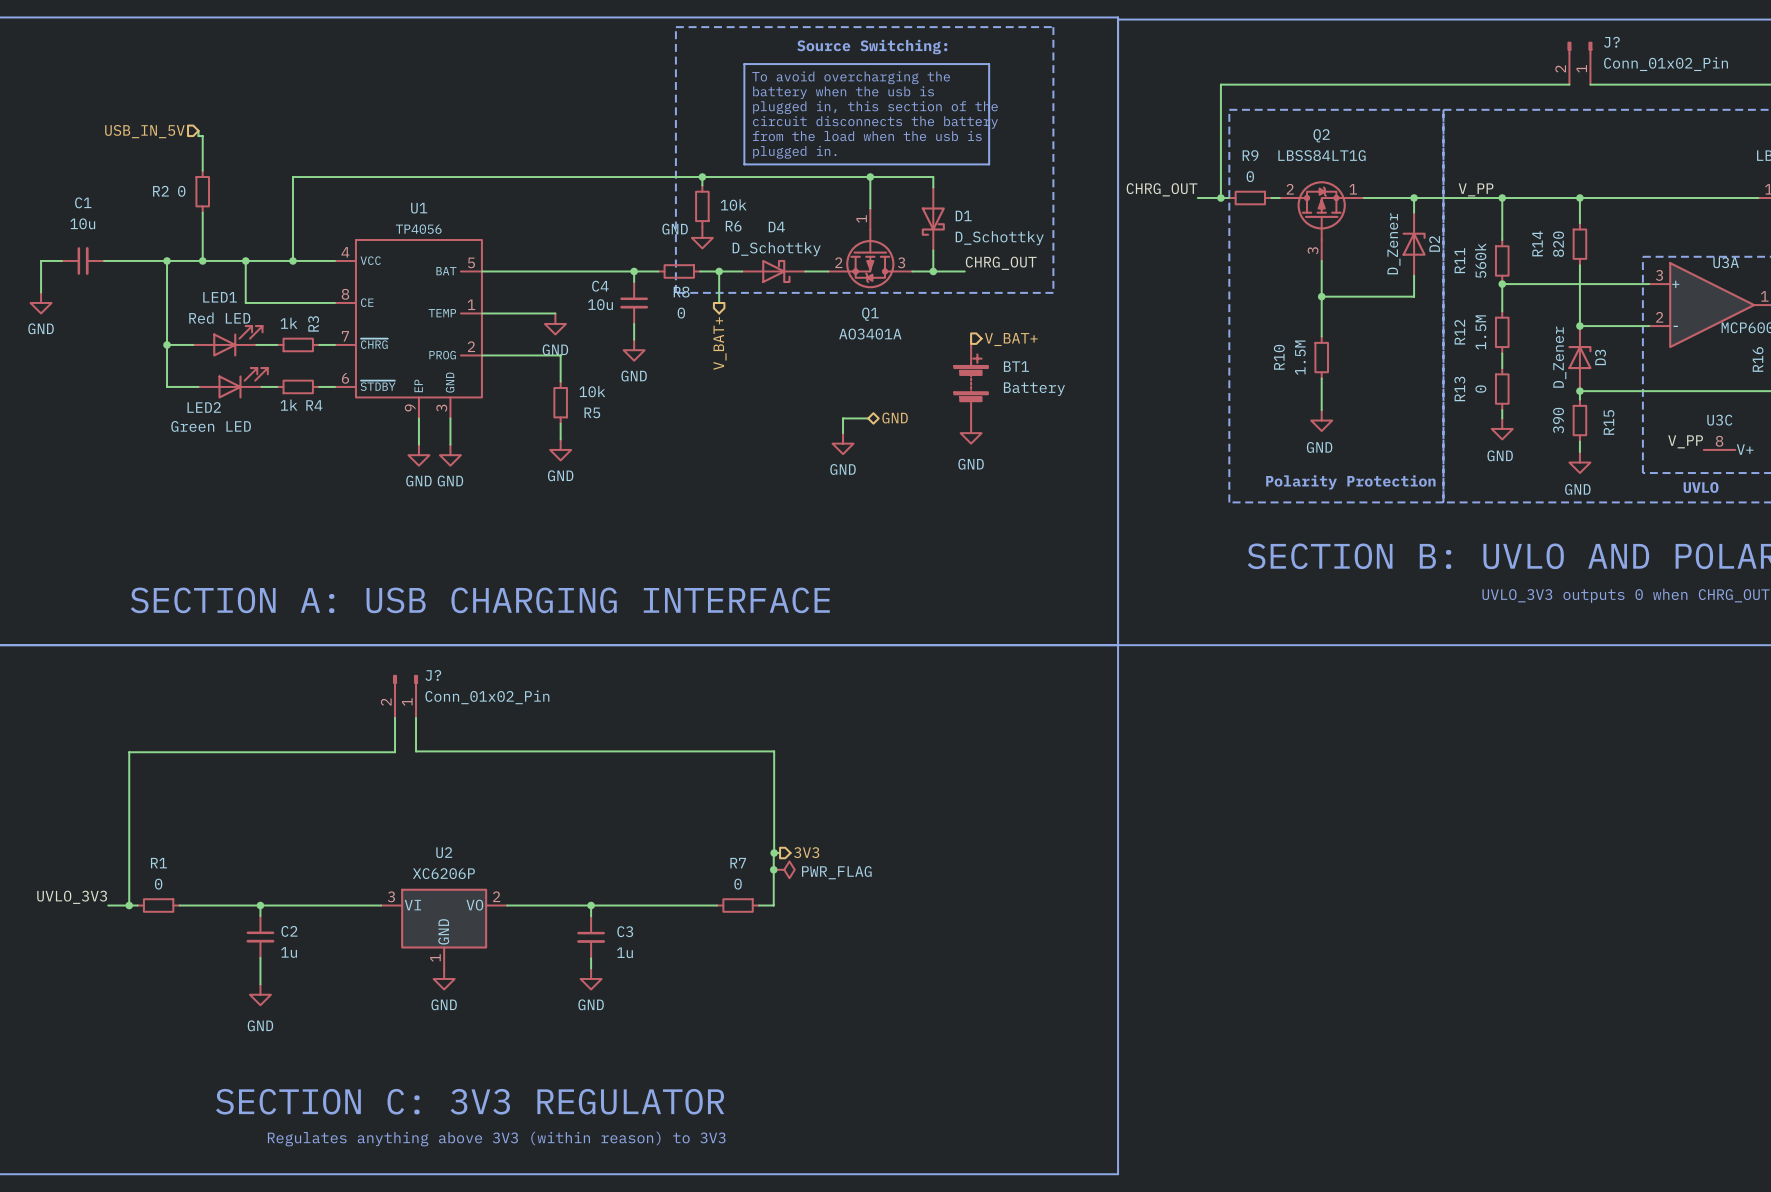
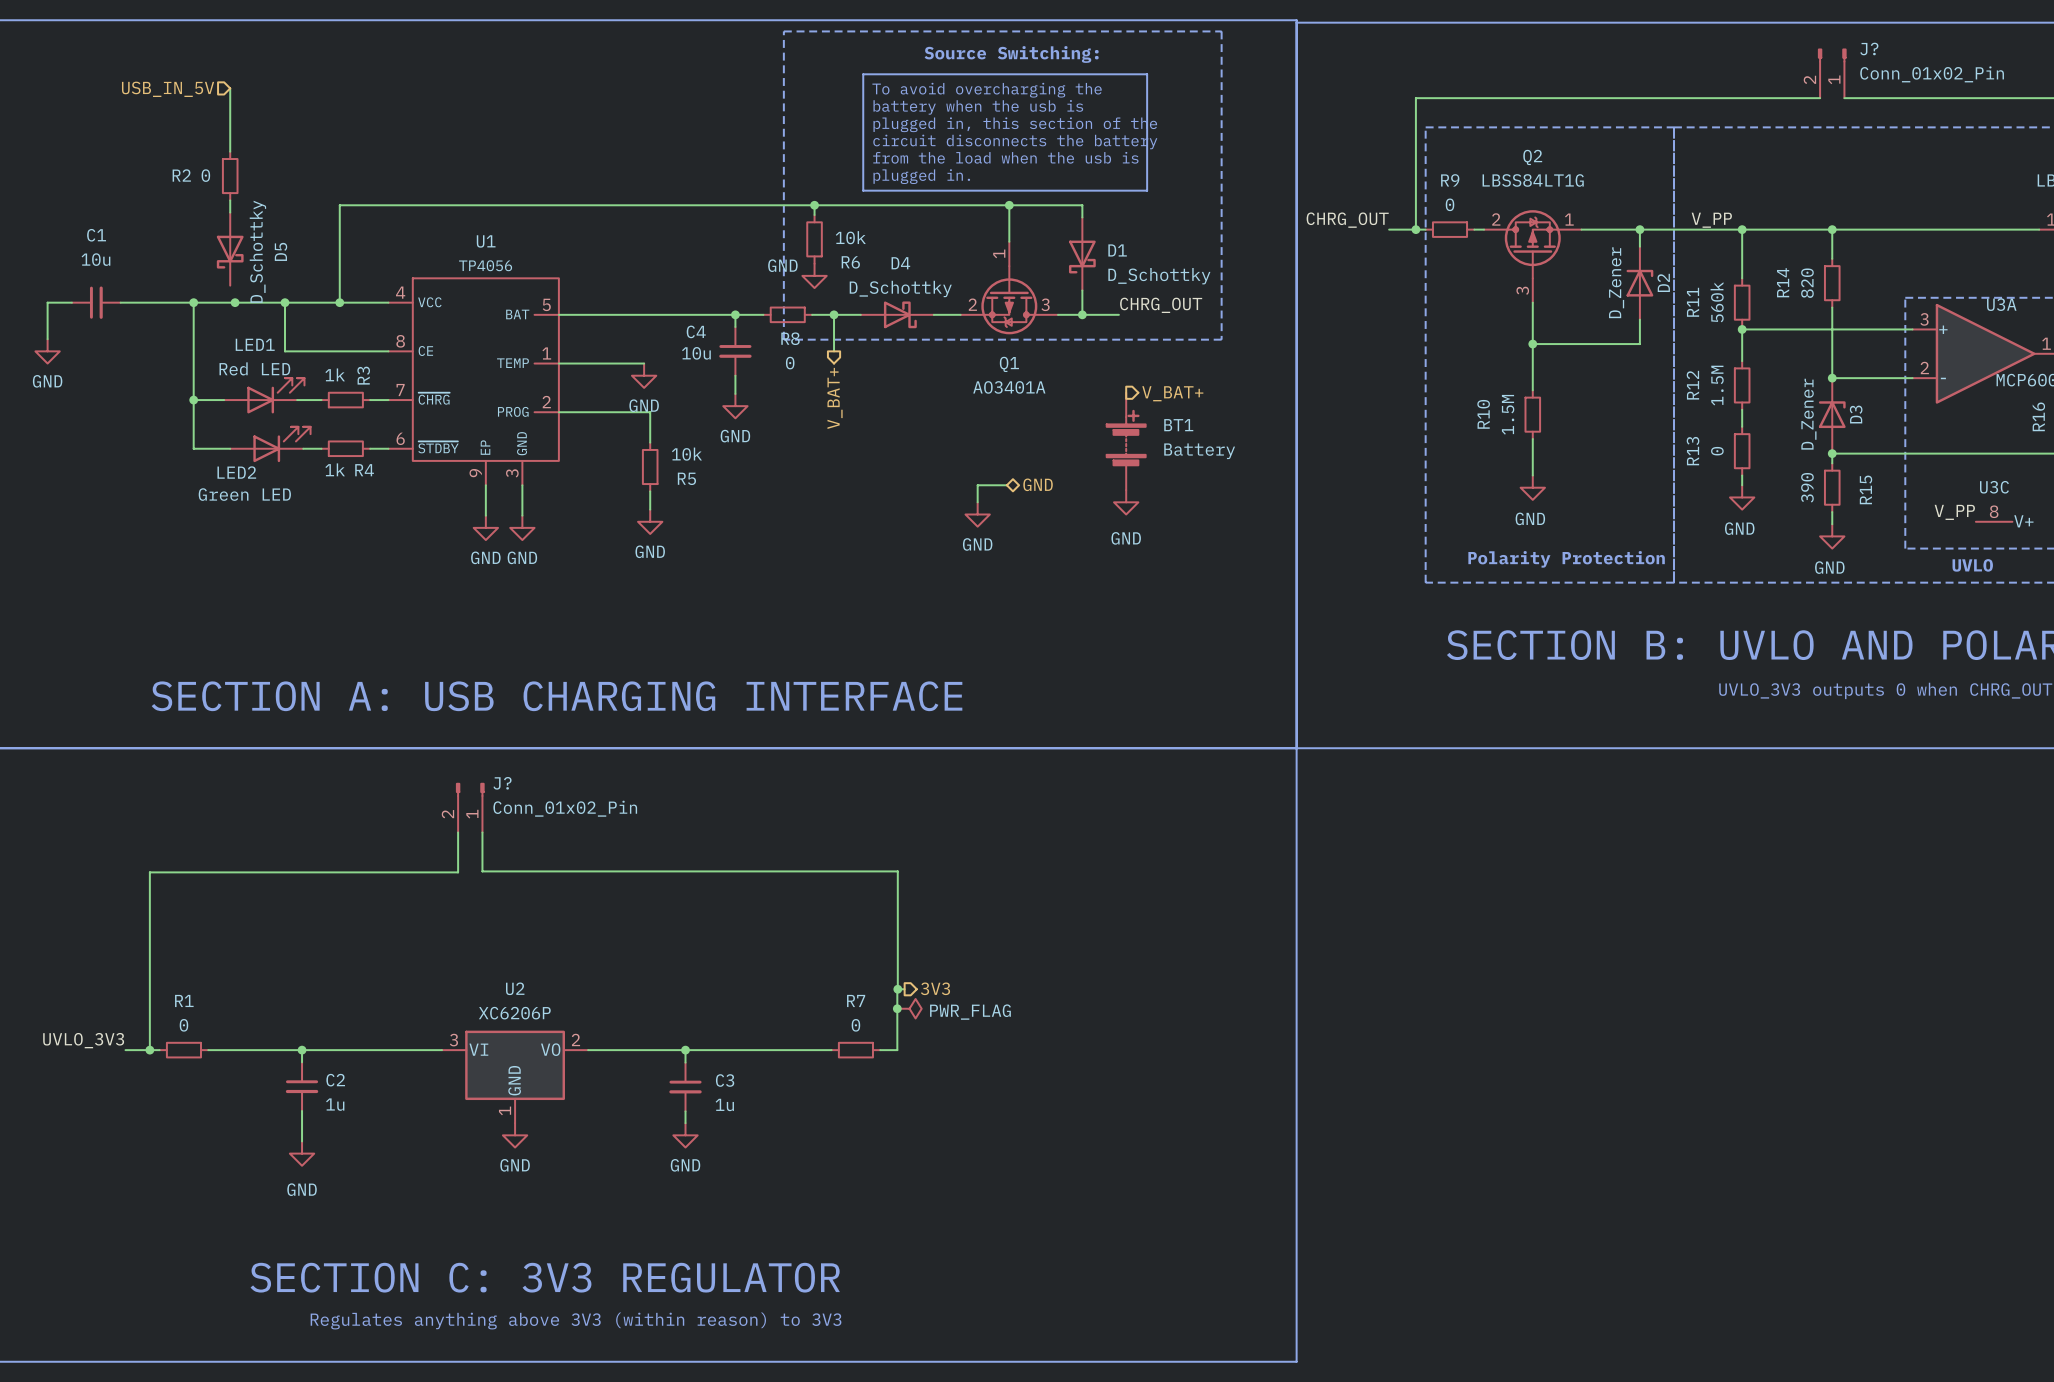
wire: (198, 130) (198, 136) (202, 136) (202, 170) -> (230, 151) (230, 88)
hierarchical label position: USB_IN_5V (144, 131) -> USB_IN_5V (168, 89)
wire: none -> (230, 200) (230, 212)
R2 position: (202, 191) -> (230, 176)
wire: (202, 212) (202, 260) -> none
D5: none -> D_Schottky (230, 249)

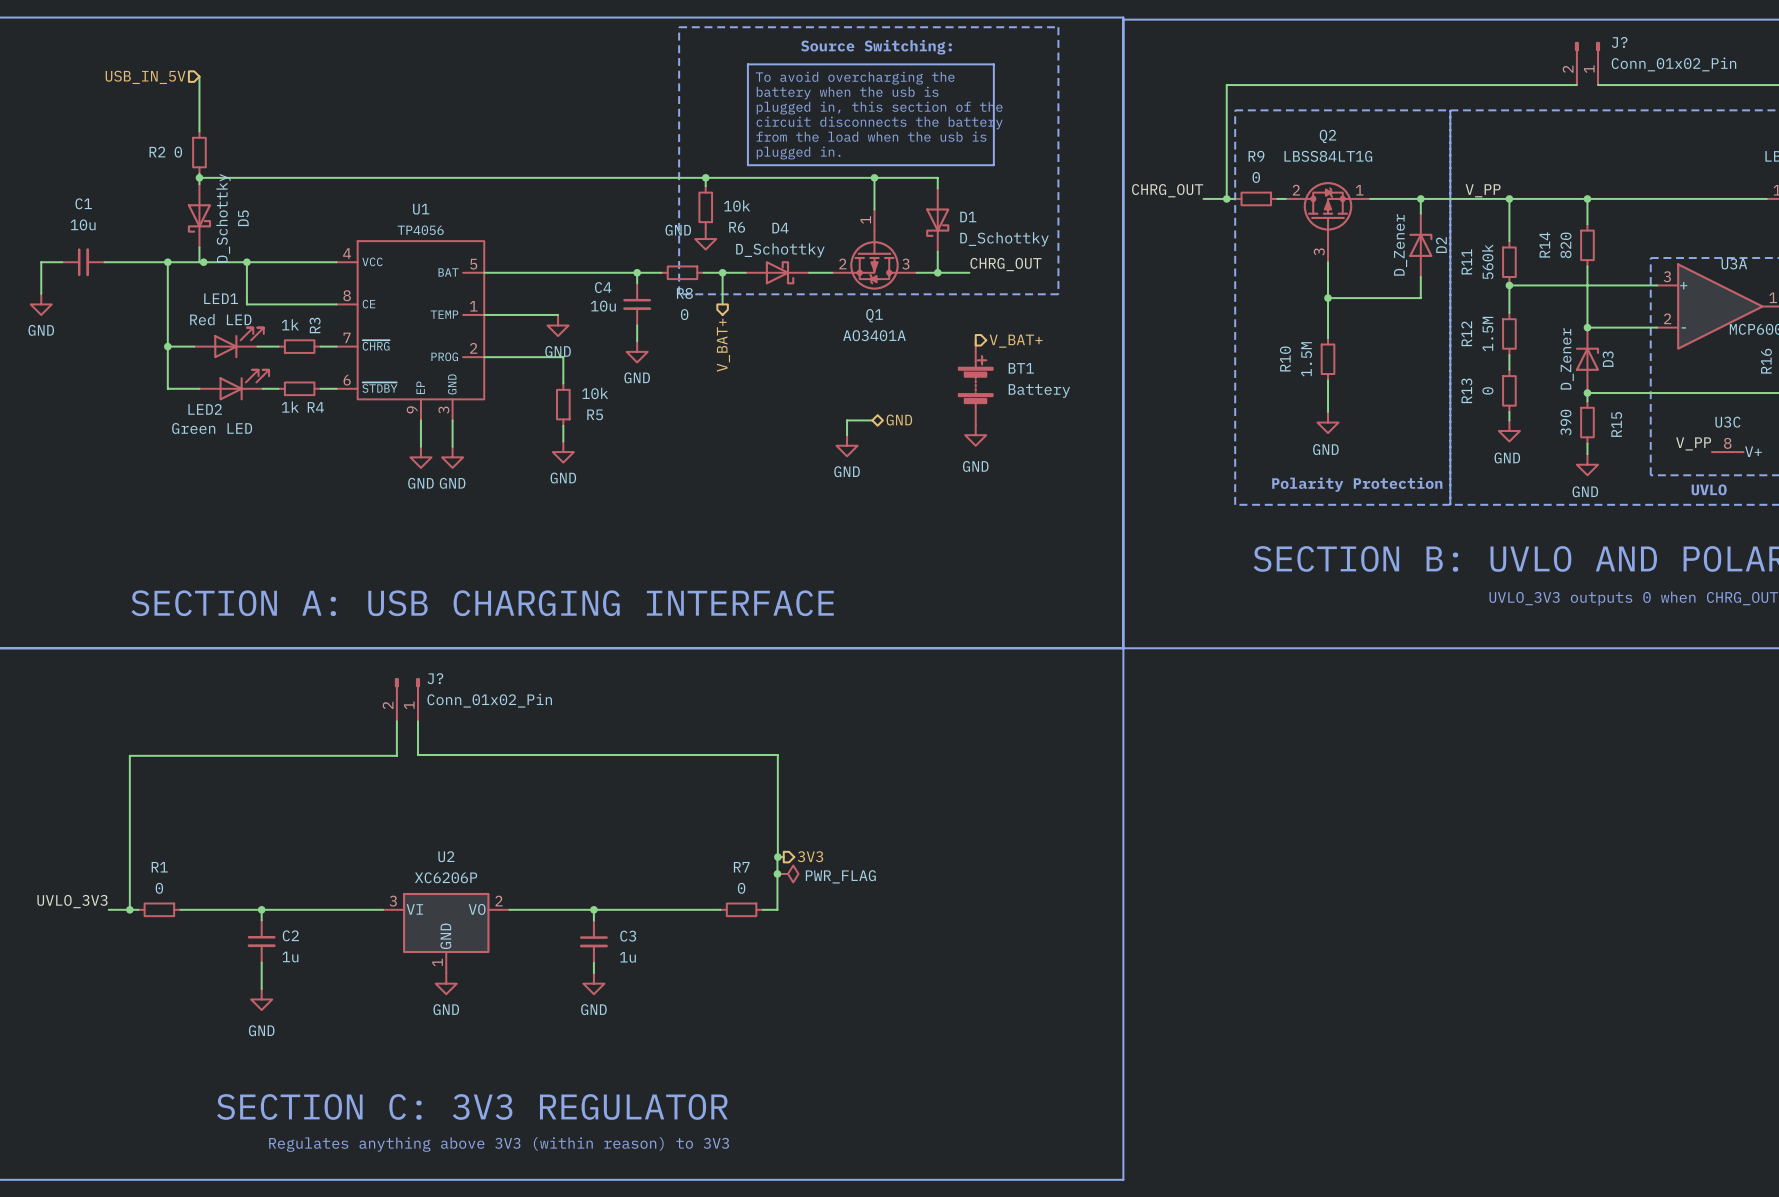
junction: none -> (199, 177)
wire: (339, 205) (339, 302) -> (294, 177) (199, 177)
wire: none -> (199, 247) (199, 262)
junction: (339, 302) -> none

